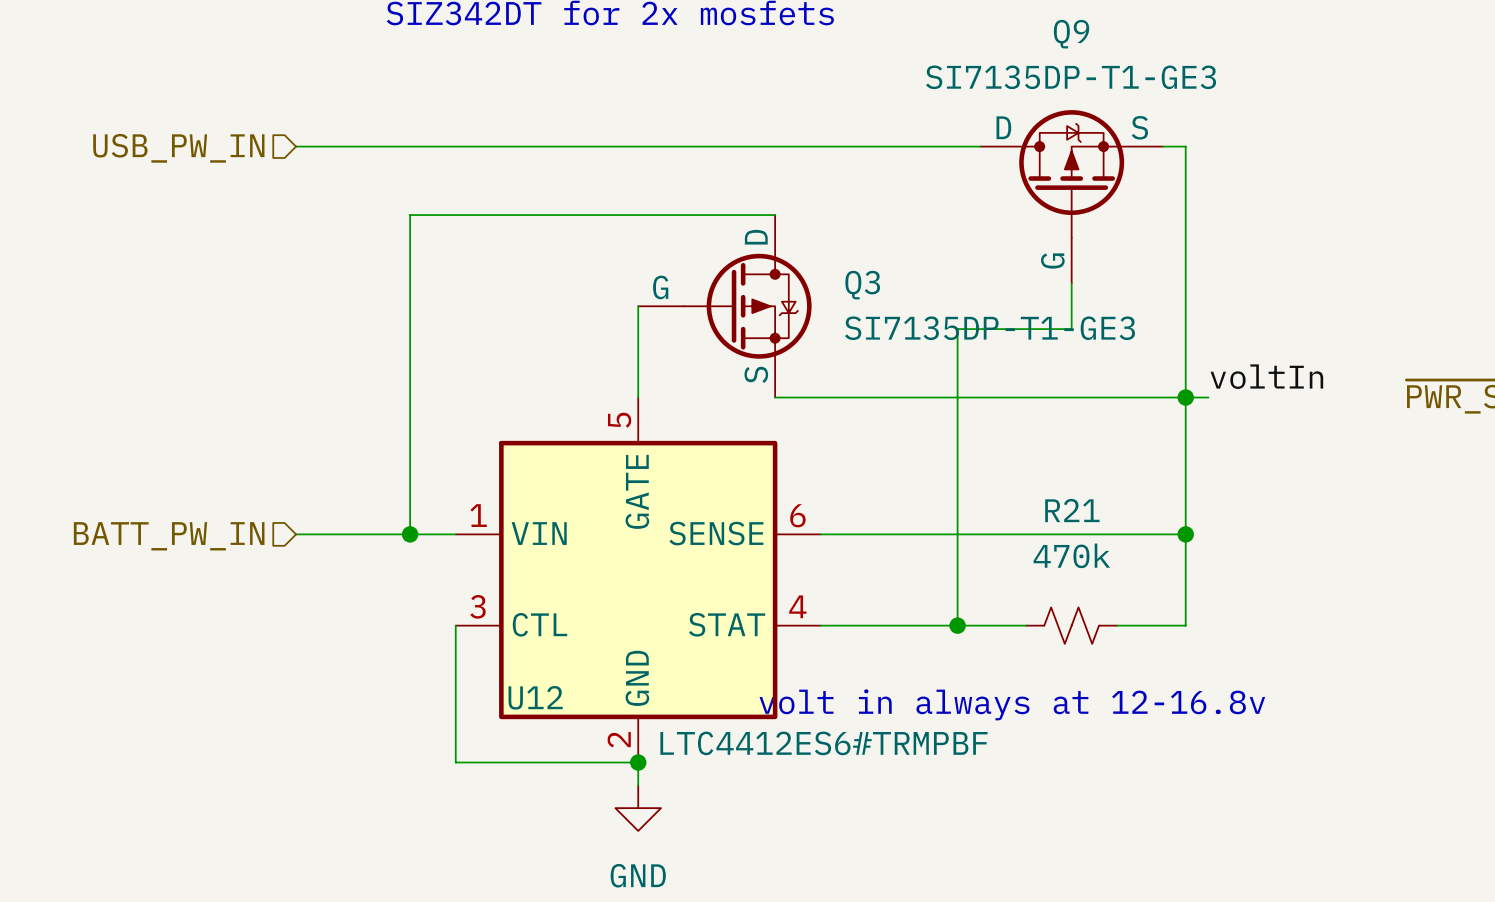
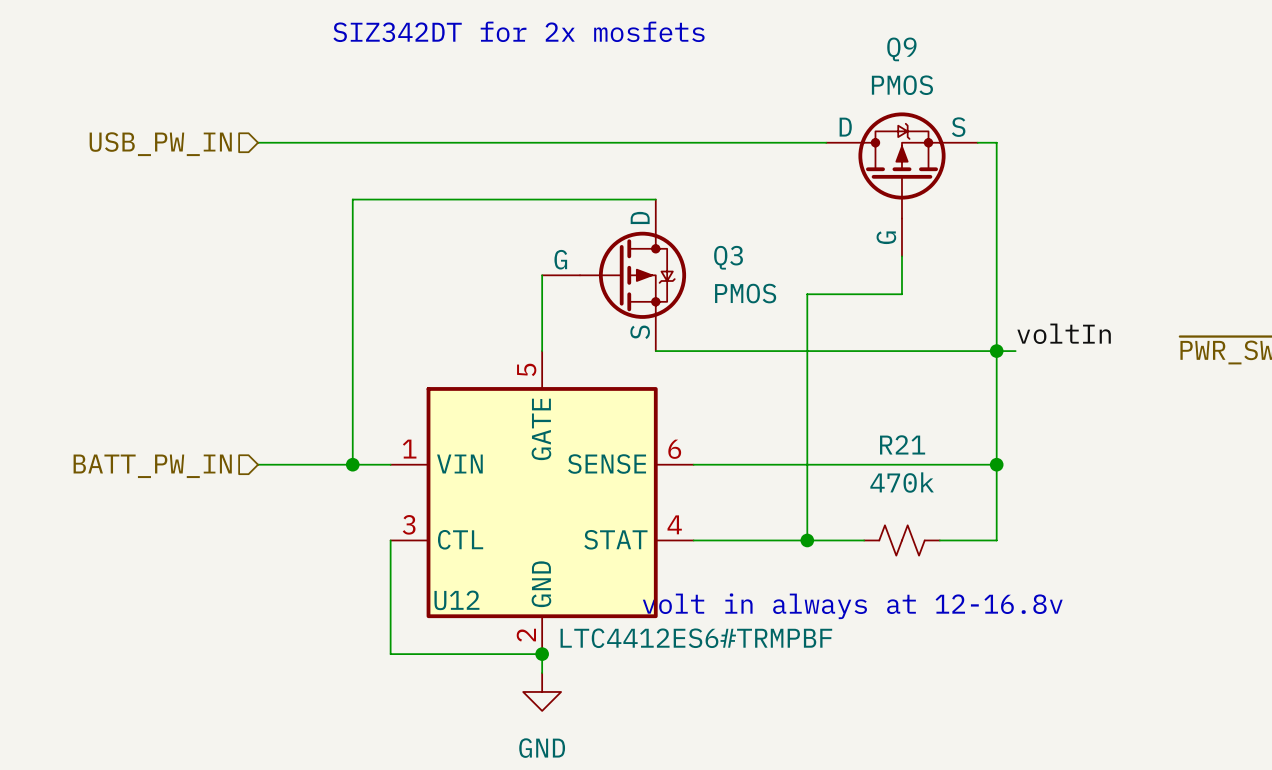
Q9 value: SI7135DP-T1-GE3 (1071, 77) -> PMOS (902, 85)
Q3 value: SI7135DP-T1-GE3 (990, 328) -> PMOS (745, 293)

